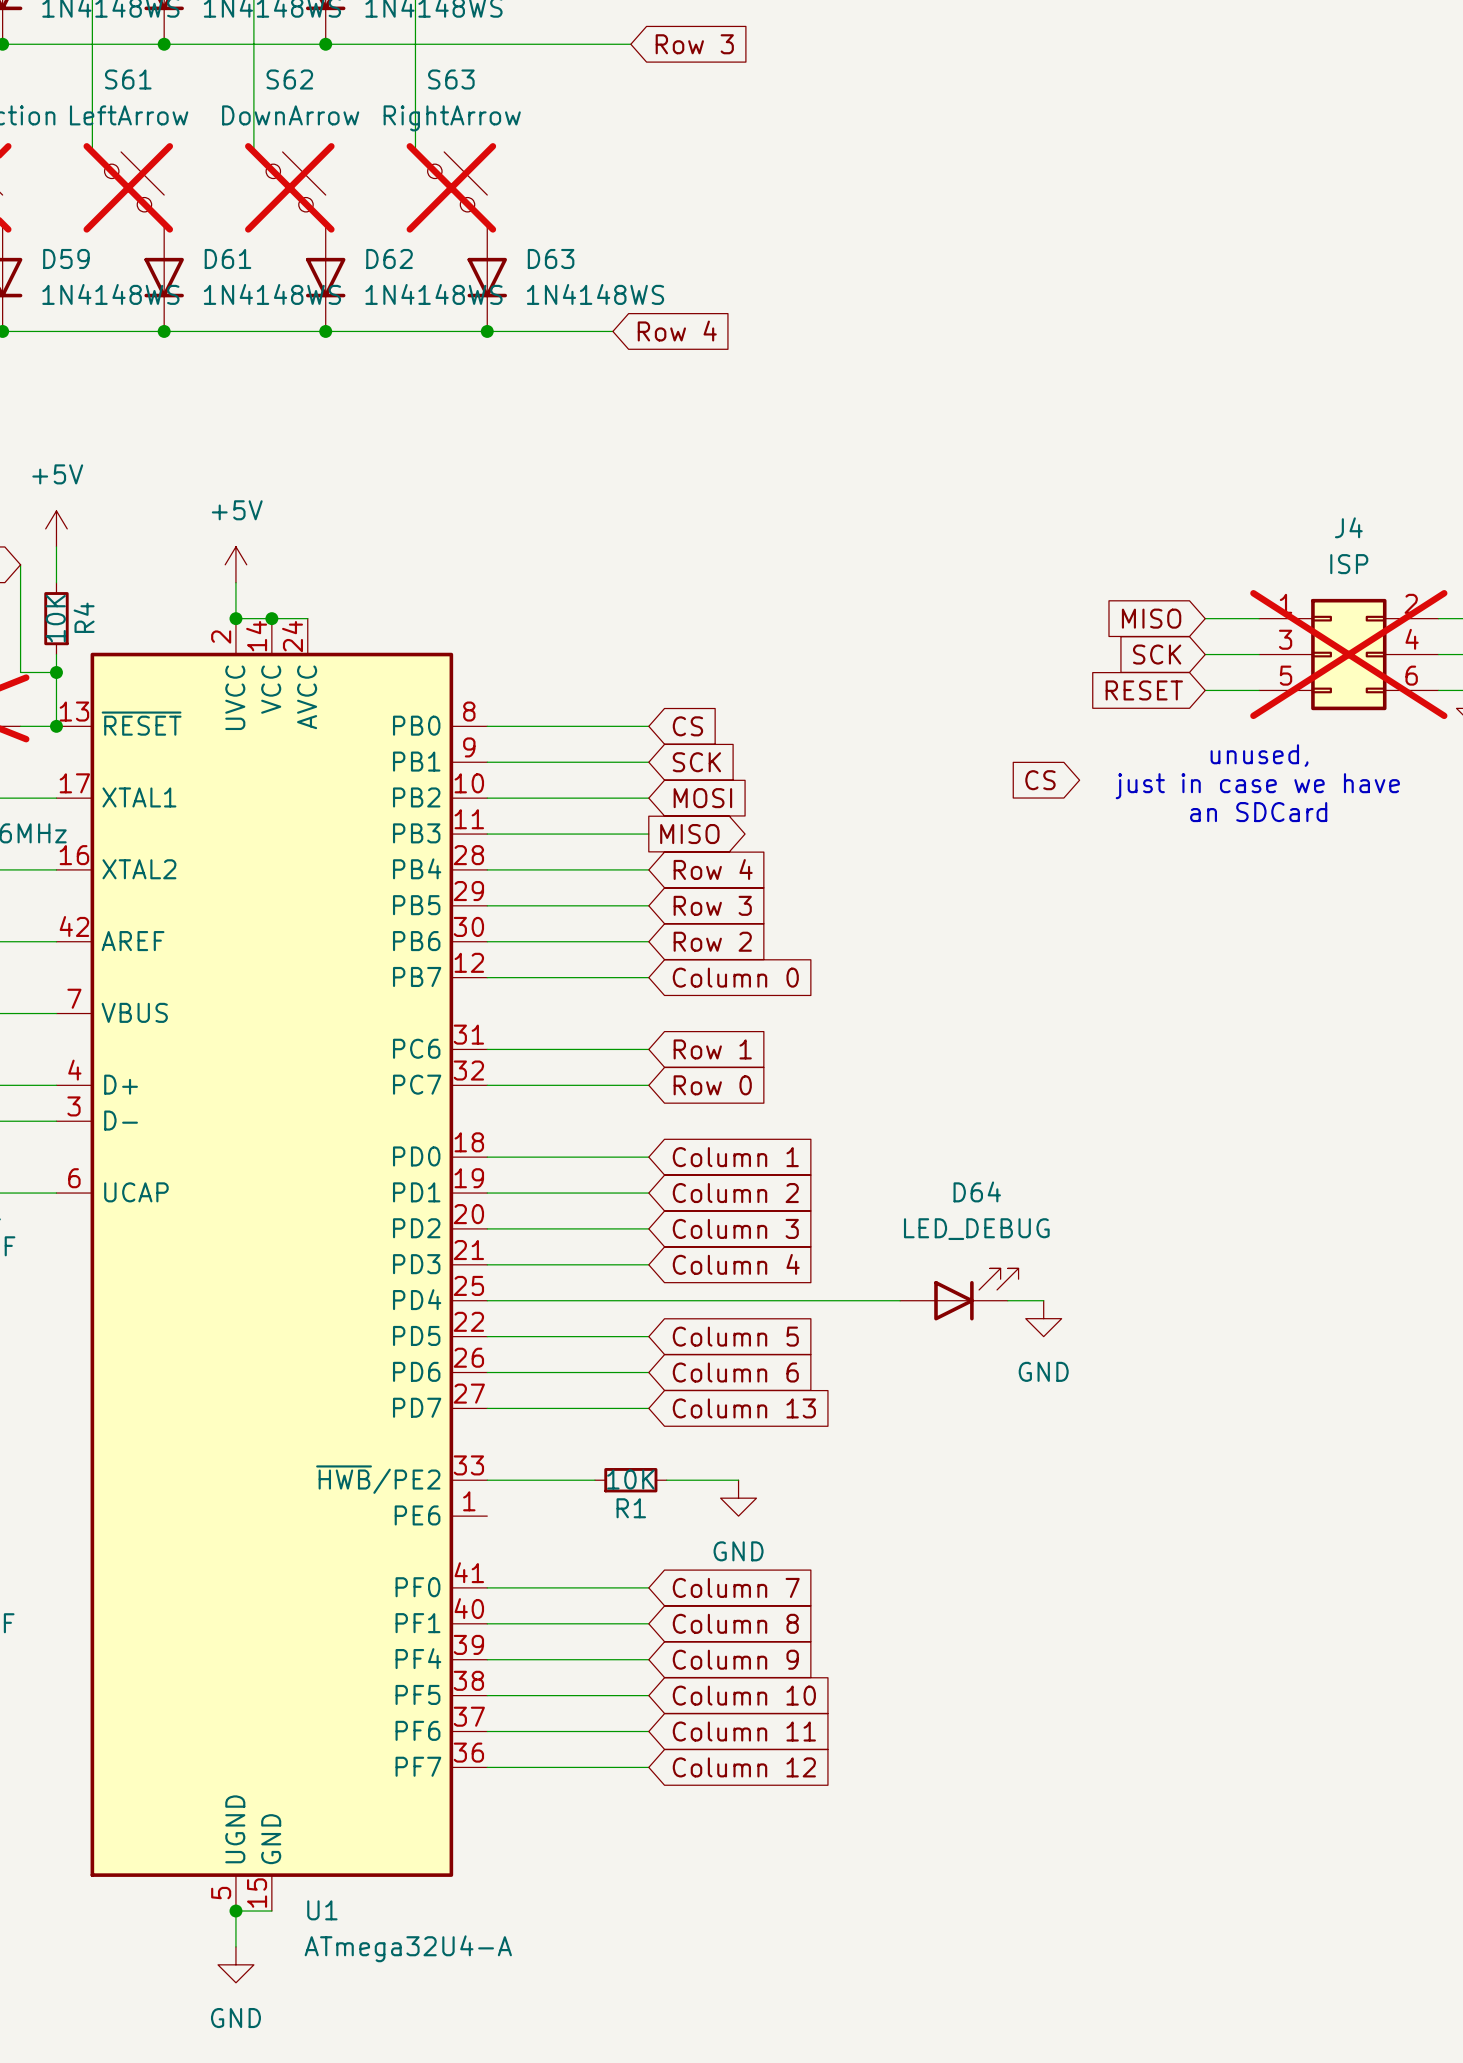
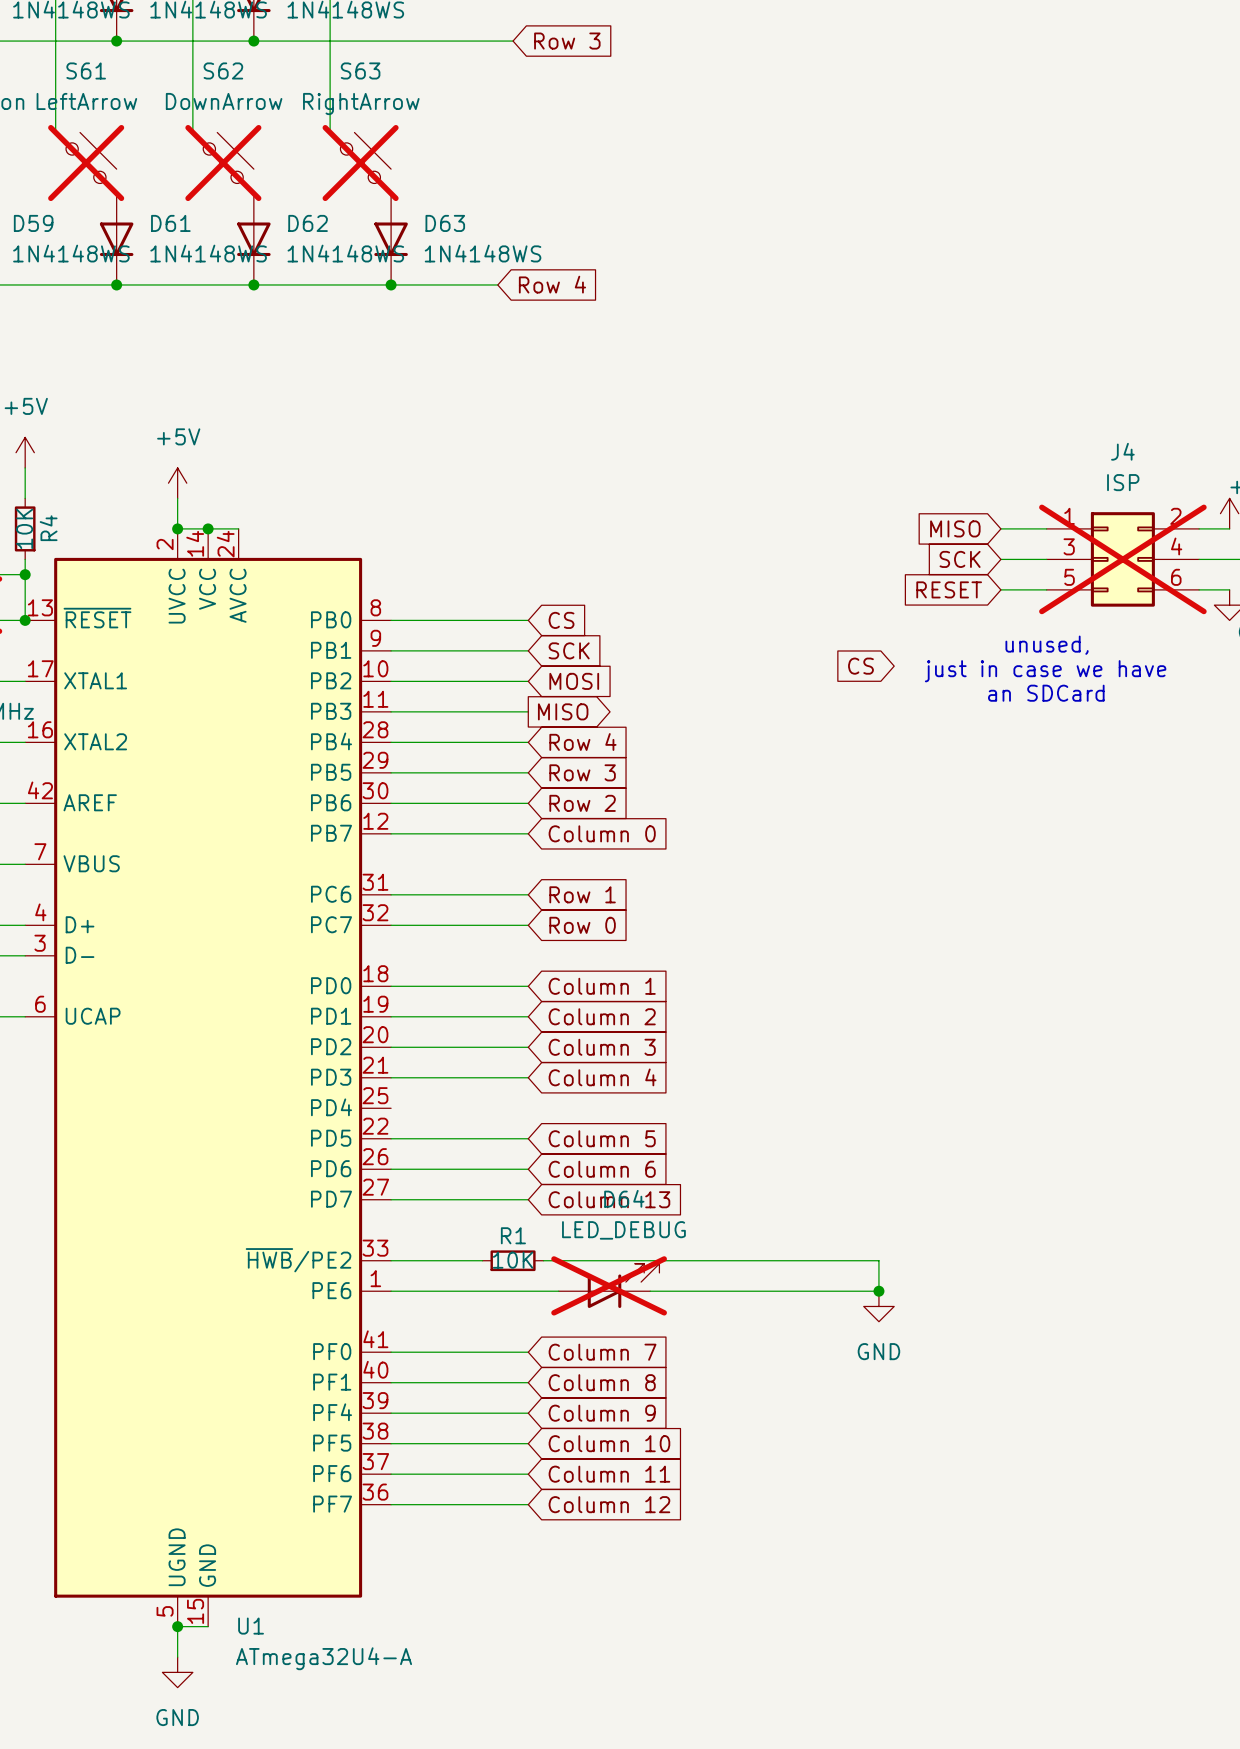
D64 position: (959, 1294) -> (609, 1285)
wire: (487, 1300) (900, 1300) -> none
wire: (1007, 1300) (1043, 1300) -> none
power symbol: GND (1043, 1318) -> none
wire: none -> (604, 1260) (878, 1260) (878, 1291) (650, 1291)
power symbol: GND (738, 1498) -> none
R1 name position: R1 (631, 1508) -> R1 (513, 1235)
D64 do-not-place cross: none -> (609, 1285)
wire: none -> (391, 1291) (558, 1291)
junction: none -> (878, 1291)
power symbol: none -> GND (878, 1306)

